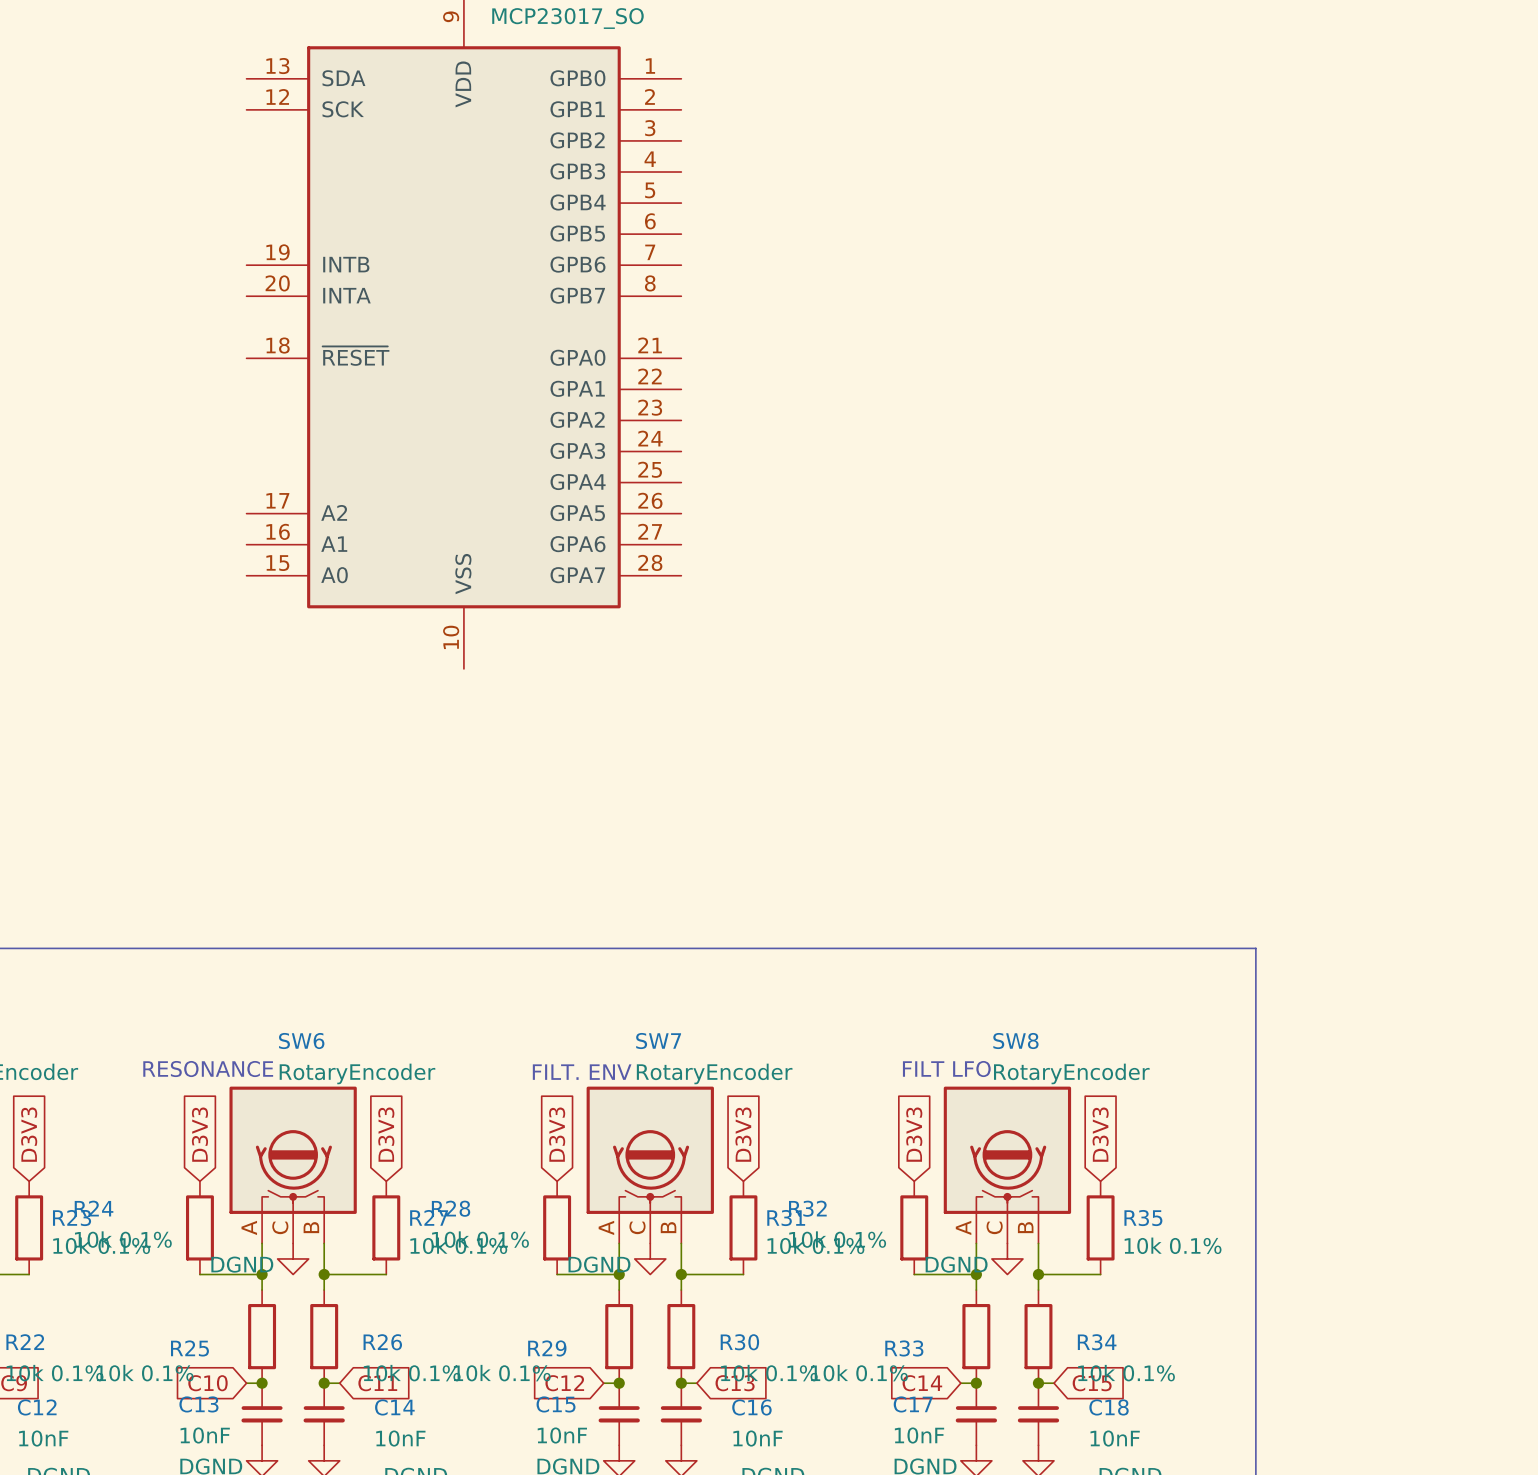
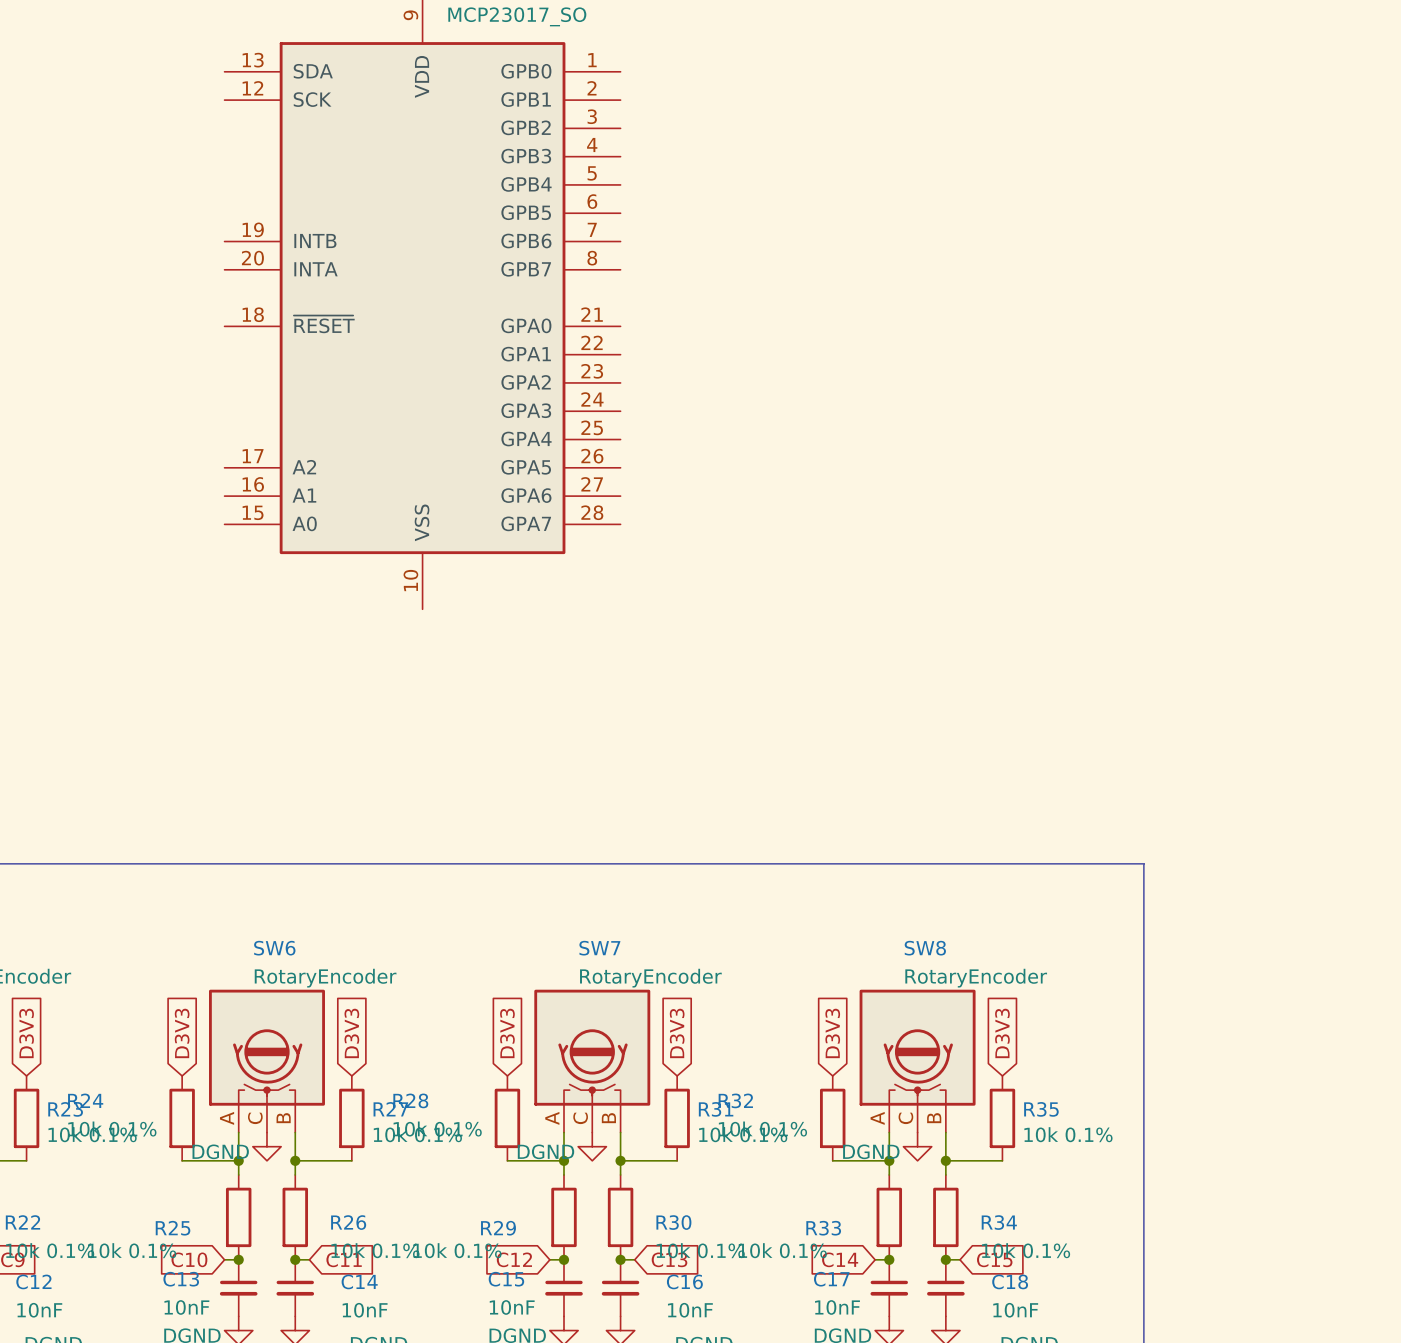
text: RESONANCE (208, 1069) -> none
text: FILT LFO (946, 1069) -> none
text: FILT. ENV (582, 1072) -> none

